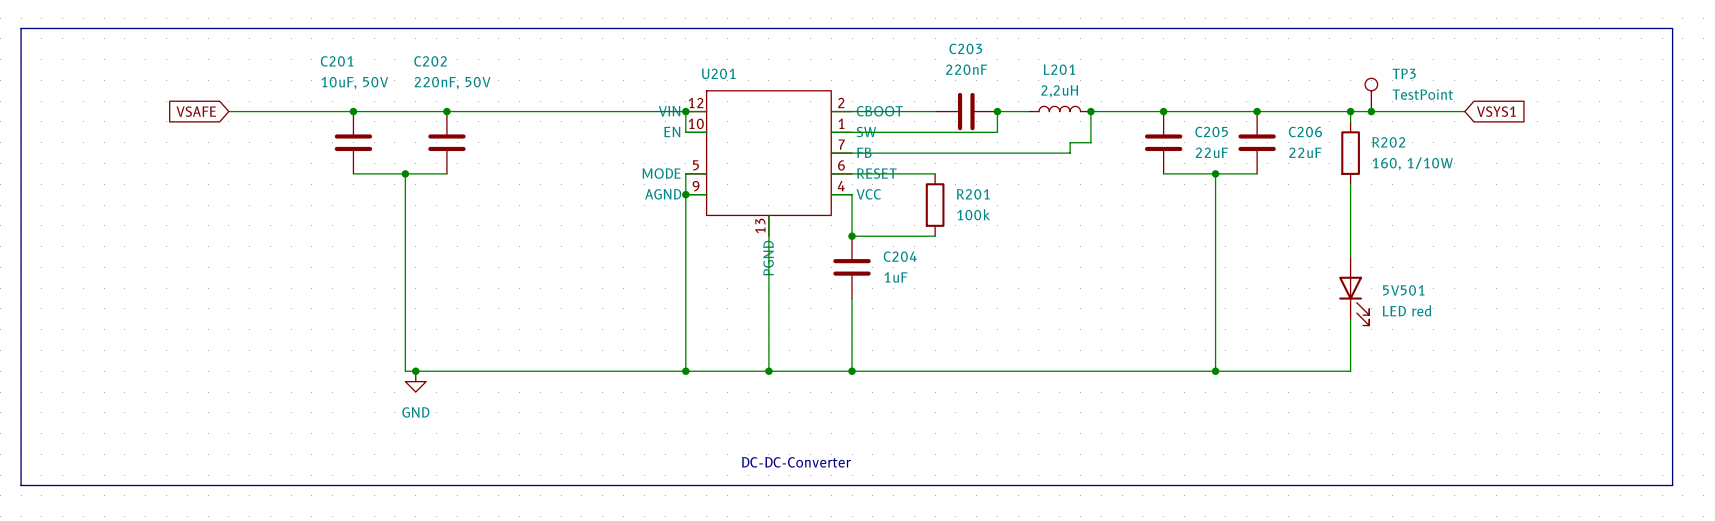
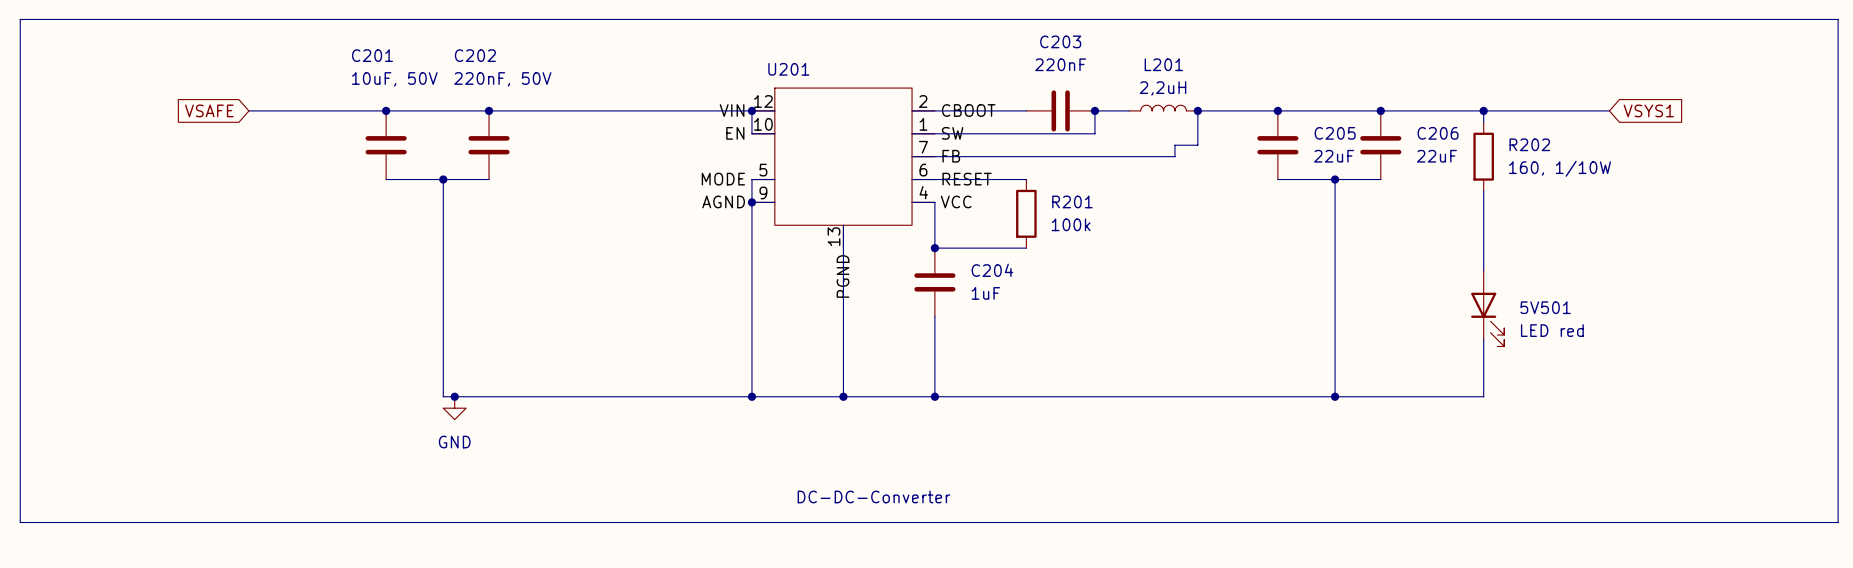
TP3: TestPoint (1371, 94) -> none
junction: (1371, 111) -> none

